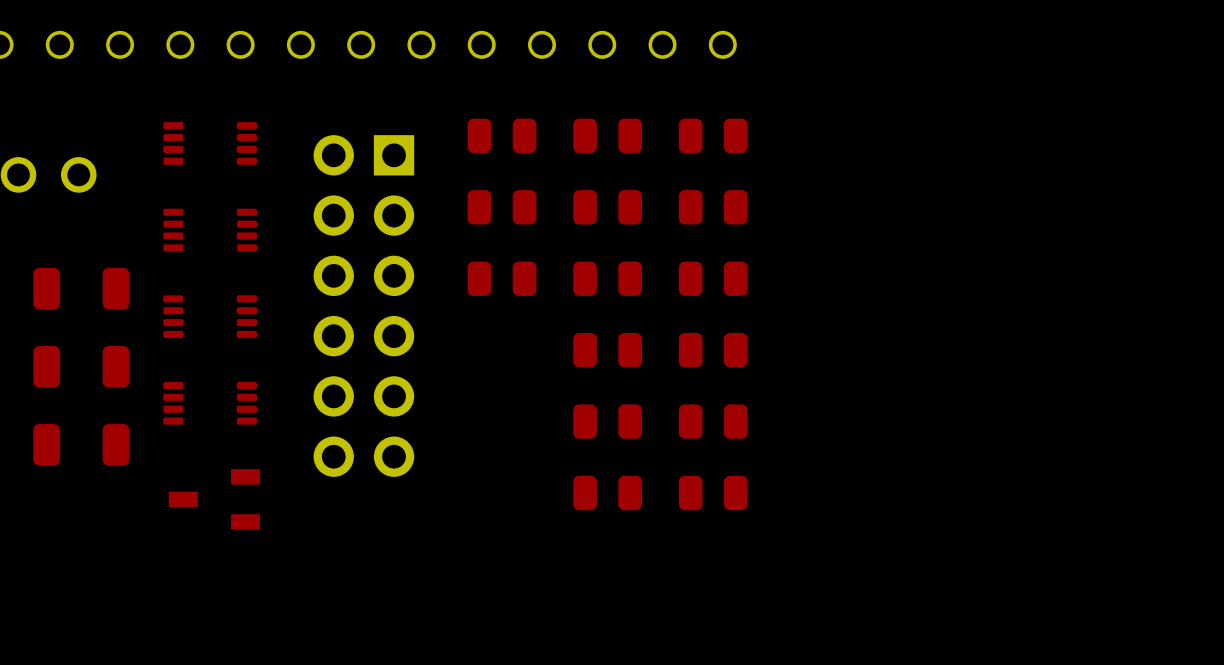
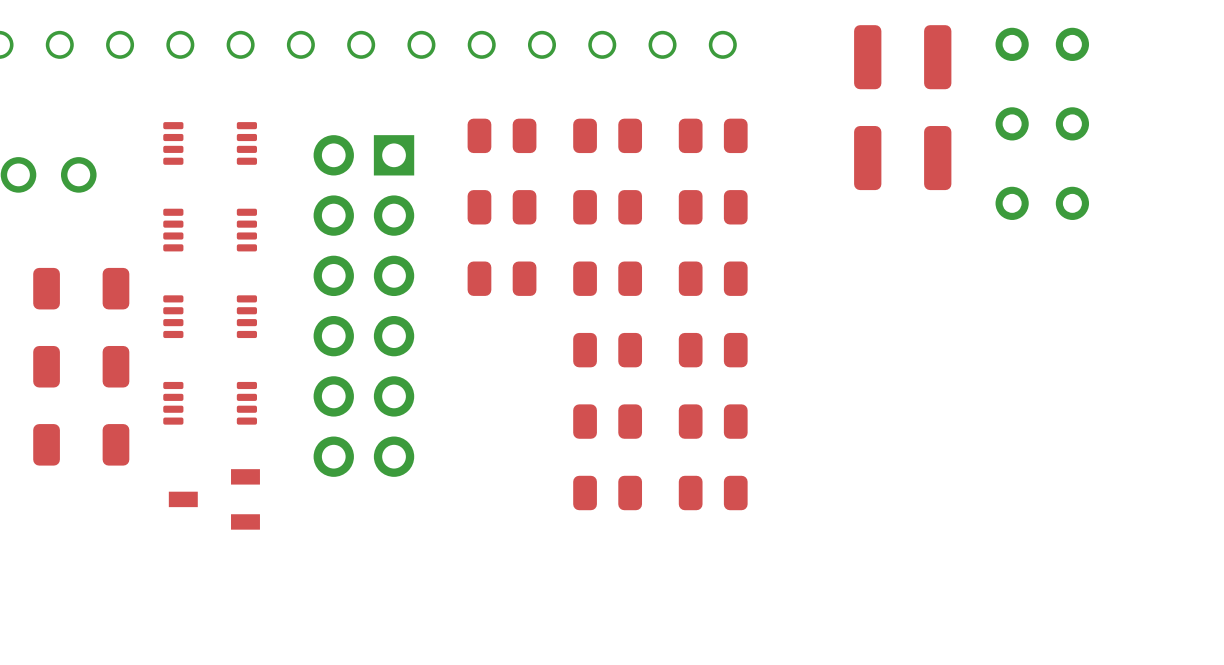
part: none -> (1042, 44)
part: none -> (902, 57)
part: none -> (1042, 123)
part: none -> (902, 158)
part: none -> (1042, 203)

